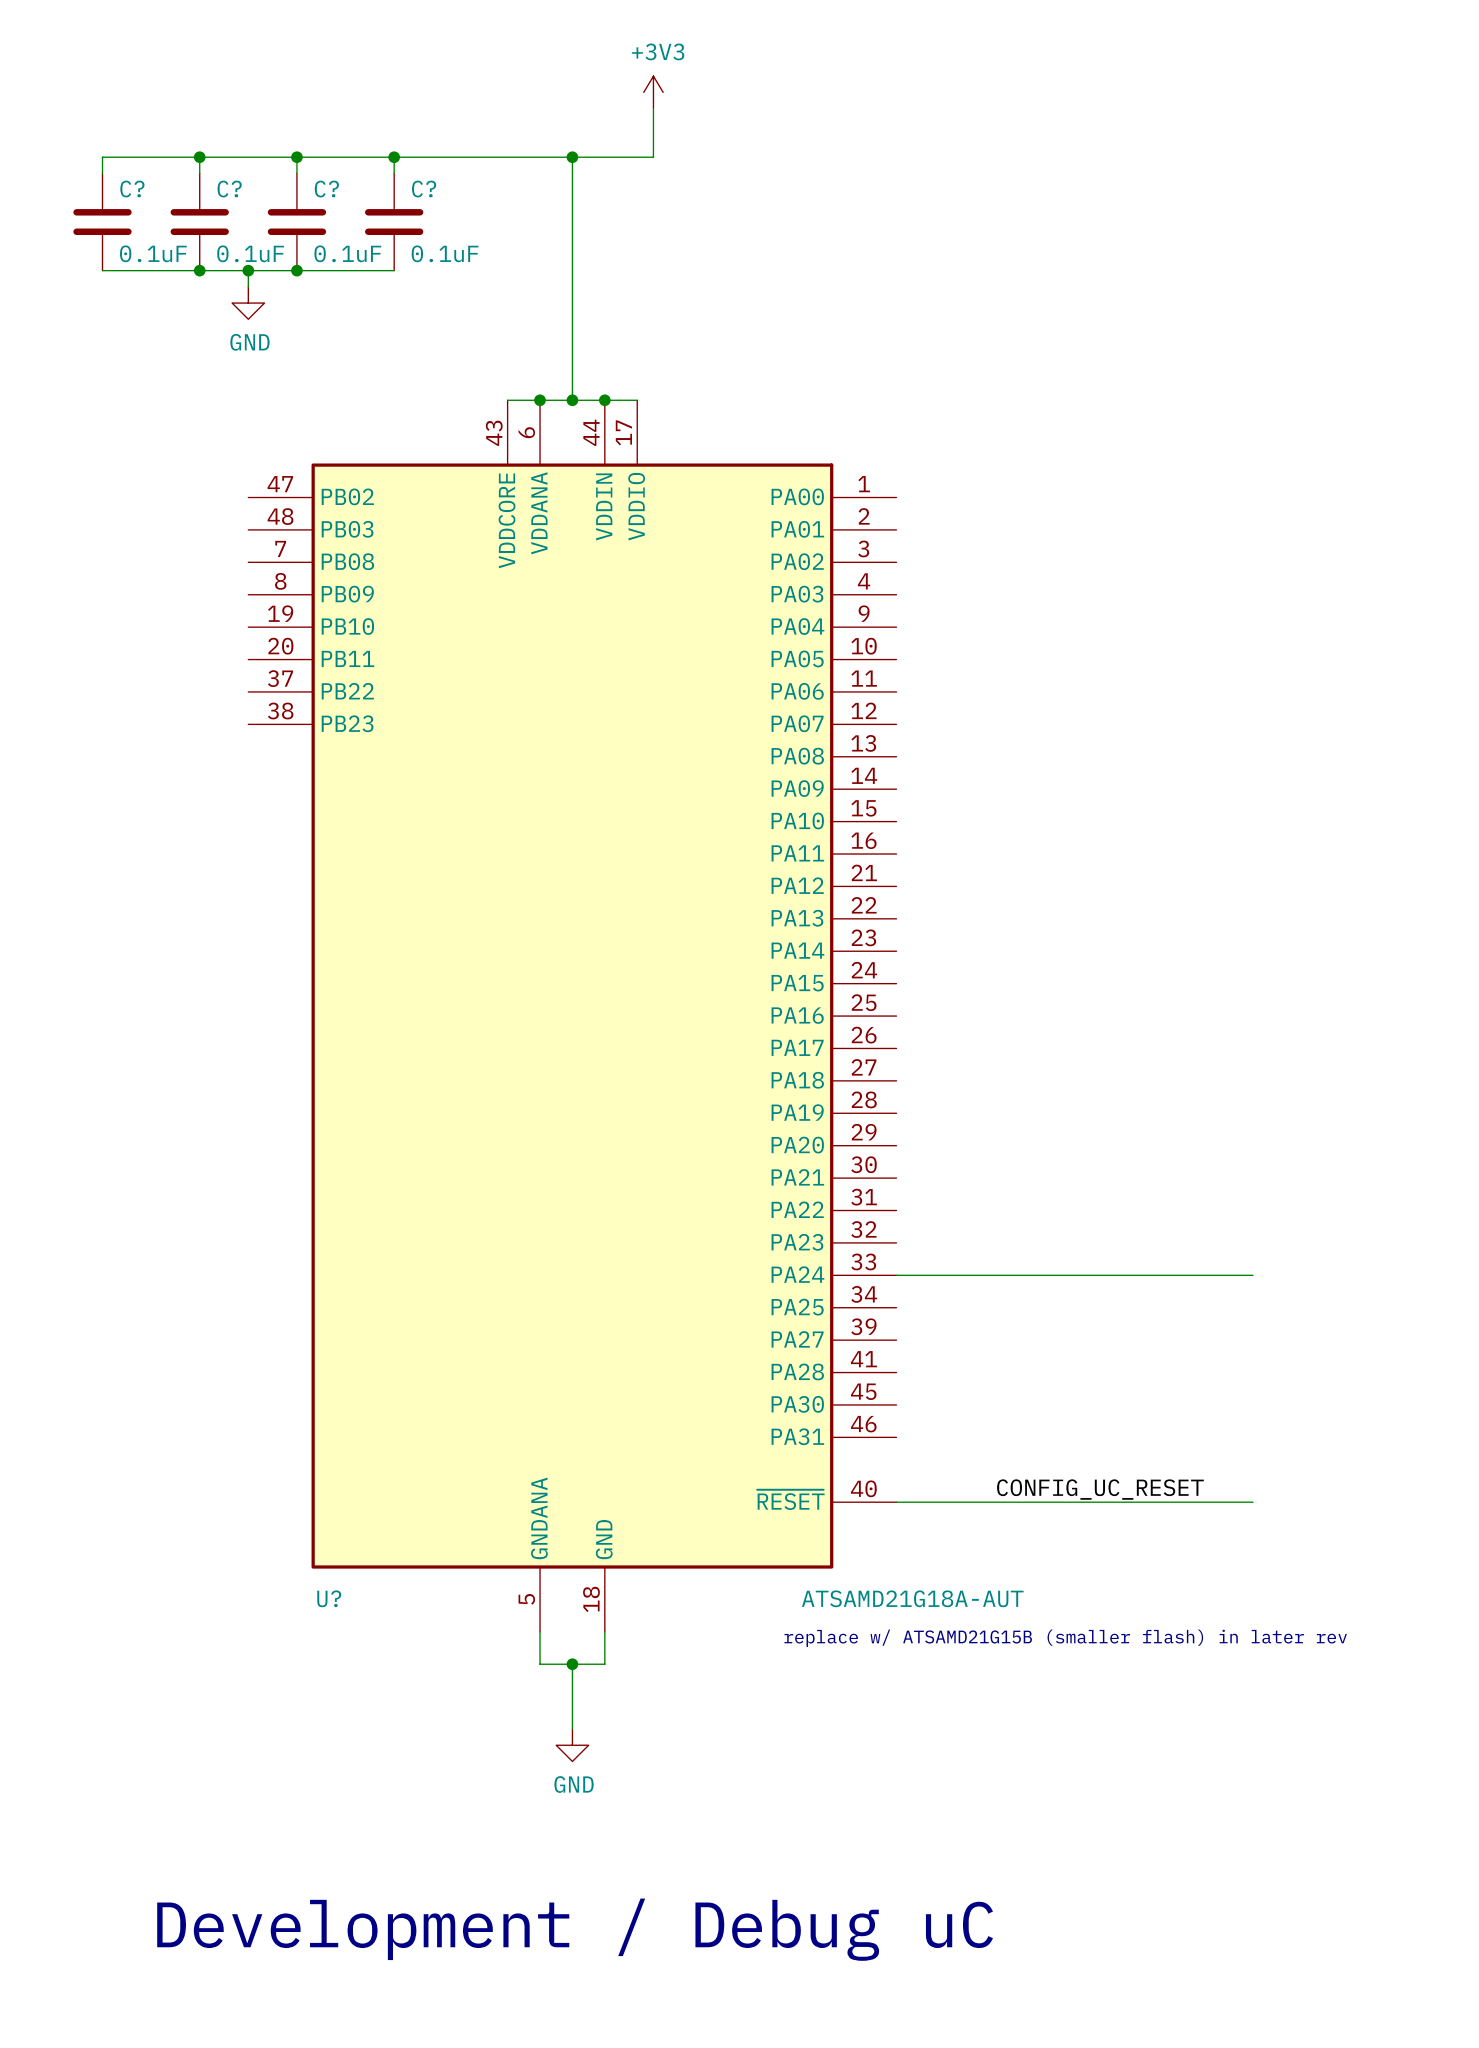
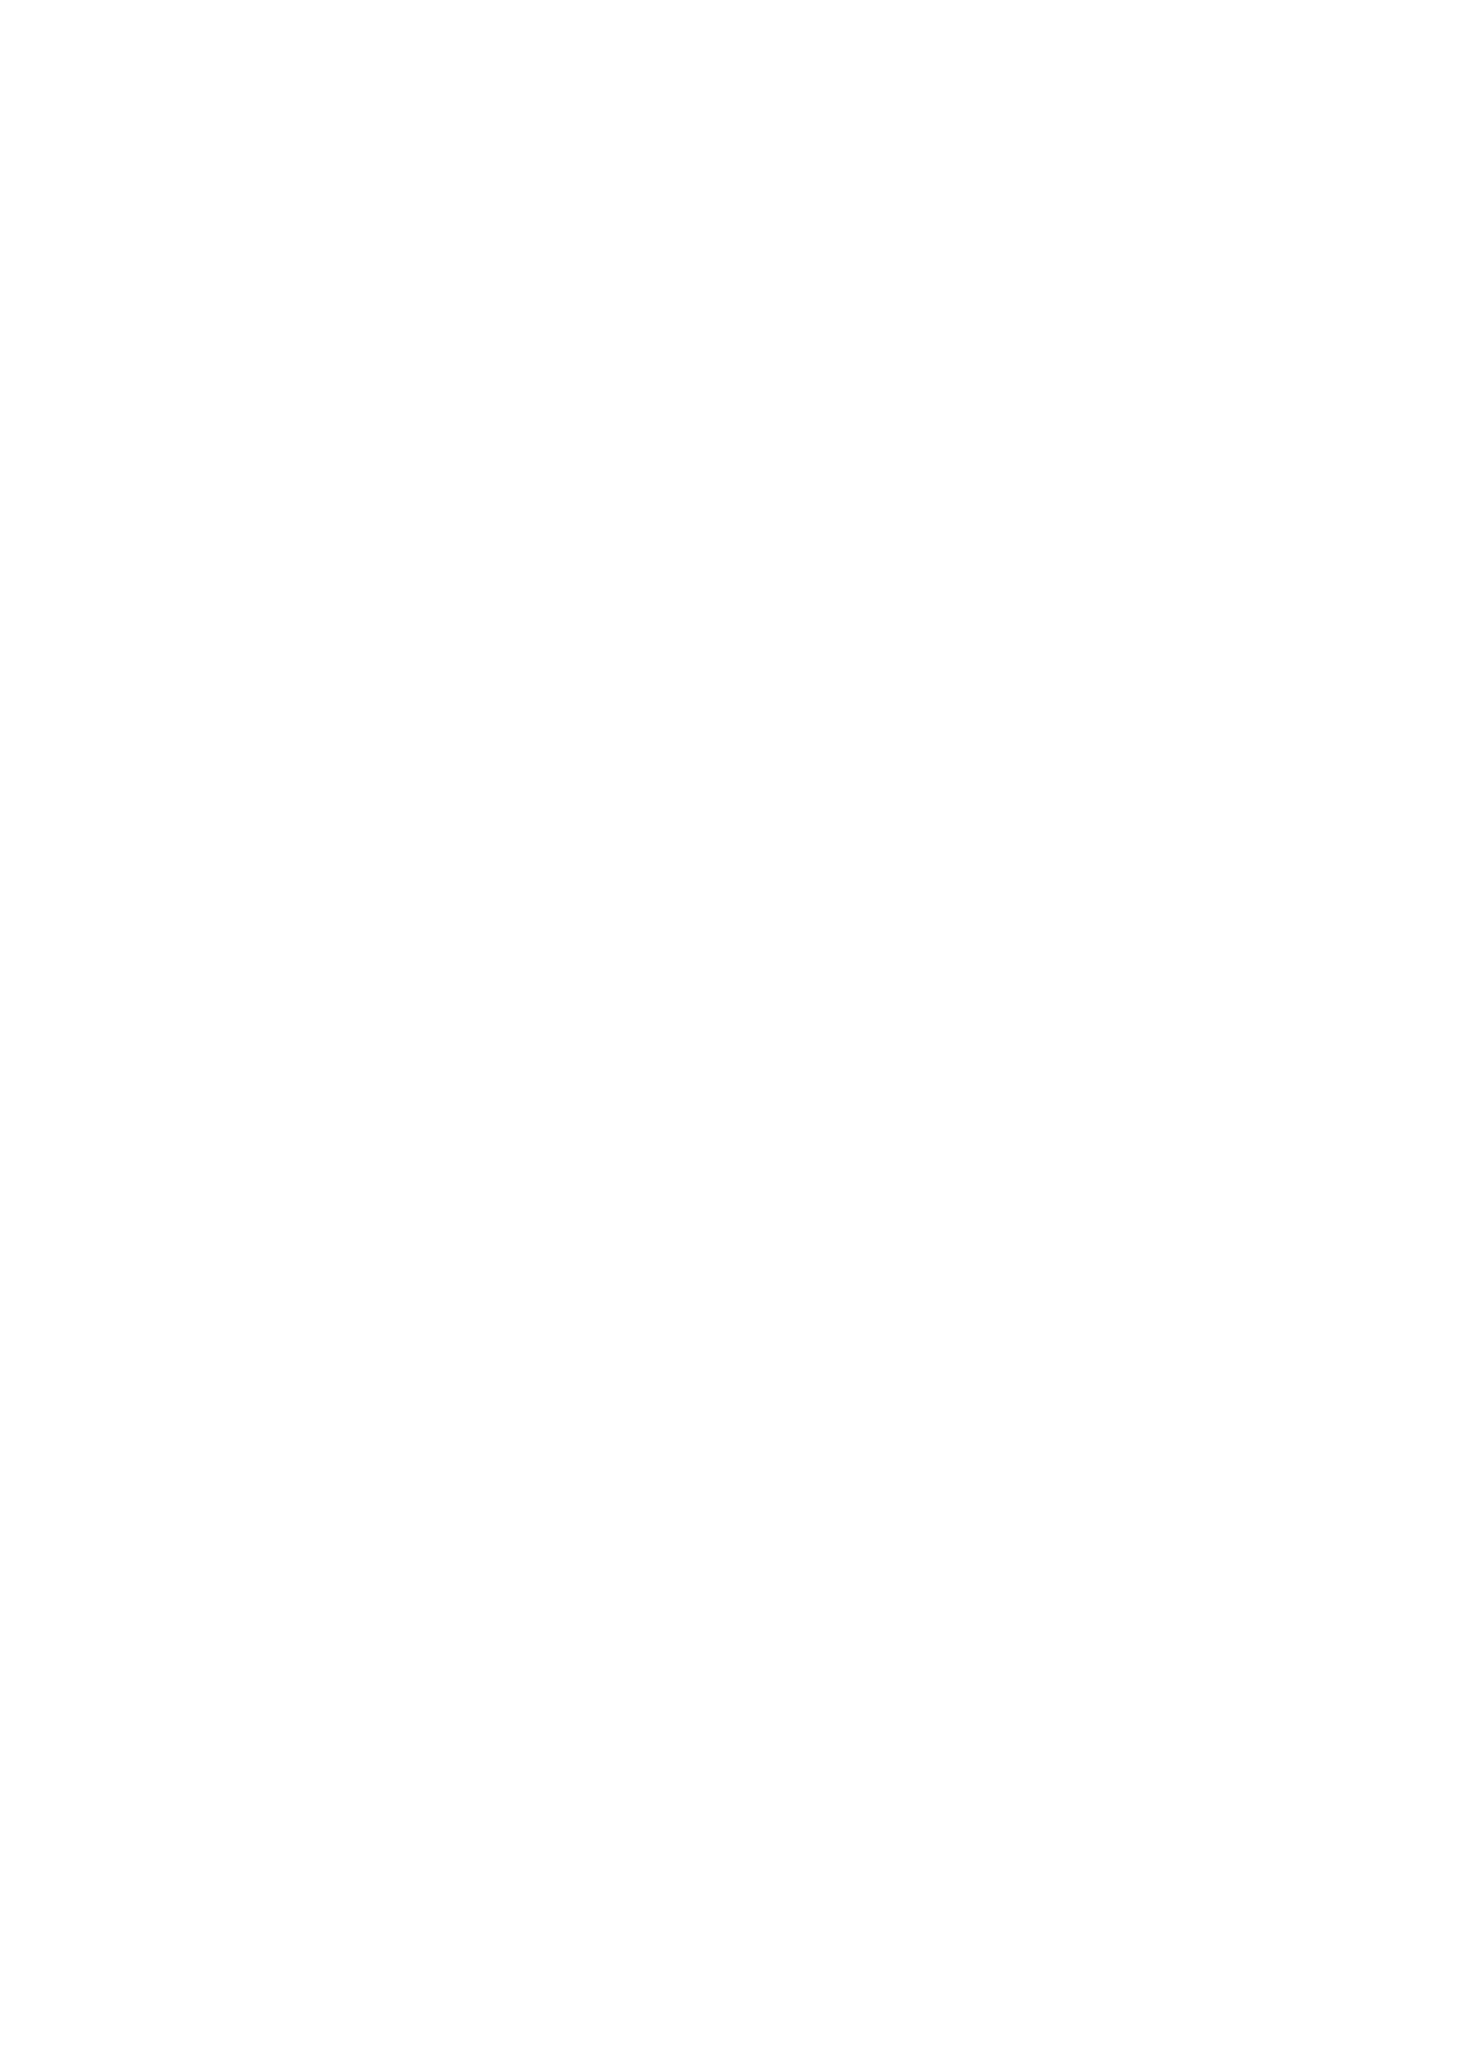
power symbol: +3V3 (653, 92) -> none
wire: (653, 108) (653, 157) (102, 157) (102, 173) -> none
wire: (199, 157) (199, 173) -> none
junction: (199, 157) -> none
wire: (296, 157) (296, 173) -> none
junction: (296, 157) -> none
wire: (394, 157) (394, 173) -> none
junction: (394, 157) -> none
wire: (572, 157) (572, 400) -> none
junction: (572, 157) -> none
C?: 0.1uF (102, 222) -> none
C?: 0.1uF (199, 222) -> none
C?: 0.1uF (296, 222) -> none
C?: 0.1uF (394, 222) -> none
wire: (102, 270) (394, 270) -> none
junction: (199, 270) -> none
wire: (248, 270) (248, 286) -> none
junction: (248, 270) -> none
junction: (296, 270) -> none
power symbol: GND (248, 303) -> none
wire: (507, 400) (637, 400) -> none
junction: (540, 400) -> none
junction: (572, 400) -> none
junction: (604, 400) -> none
U?: ATSAMD21G18A-AUT (572, 1016) -> none
wire: (896, 1275) (1253, 1275) -> none
label: CONFIG_UC_RESET (1100, 1489) -> none
wire: (896, 1502) (1253, 1502) -> none
wire: (540, 1631) (540, 1664) (604, 1664) (604, 1631) -> none
text: replace w/ ATSAMD21G15B (smaller flash) in later rev (1065, 1638) -> none
wire: (572, 1664) (572, 1729) -> none
junction: (572, 1664) -> none
power symbol: GND (572, 1745) -> none
text: Development / Debug uC (575, 1929) -> none

